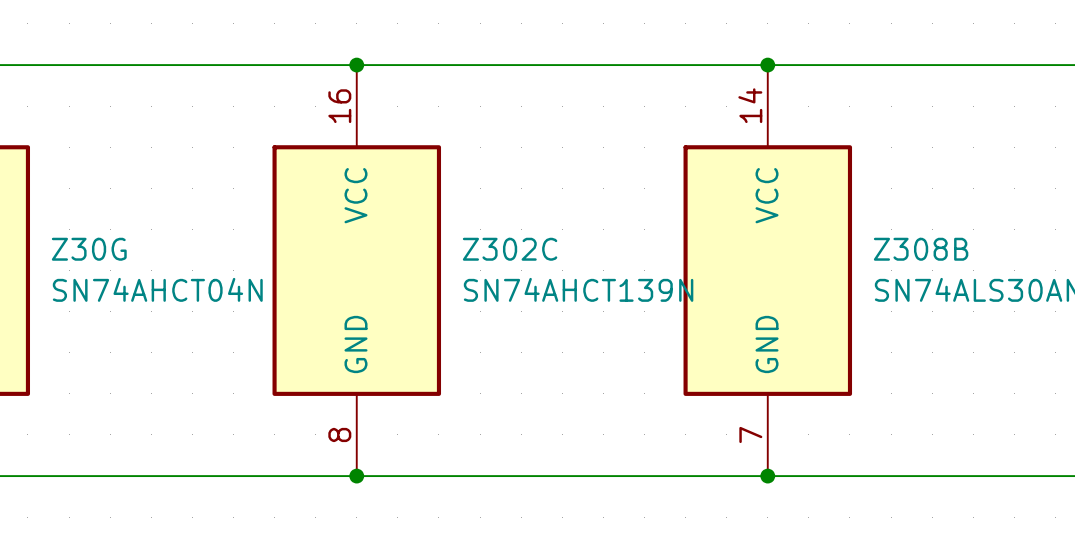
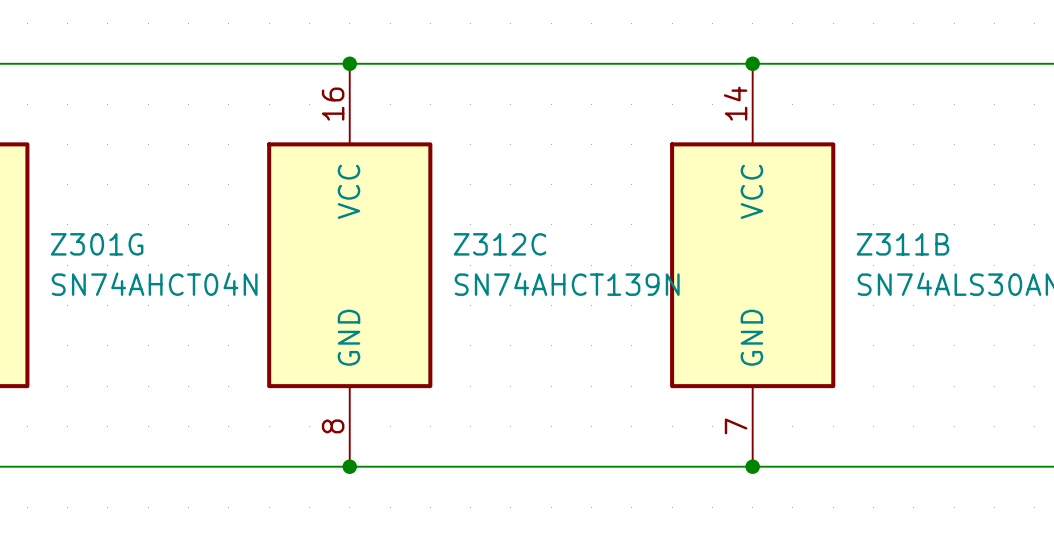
Z30G name: Z30G (89, 249) -> Z301G (97, 244)
Z302C name: Z302C (510, 249) -> Z312C (500, 244)
Z308B name: Z308B (921, 249) -> Z311B (902, 244)

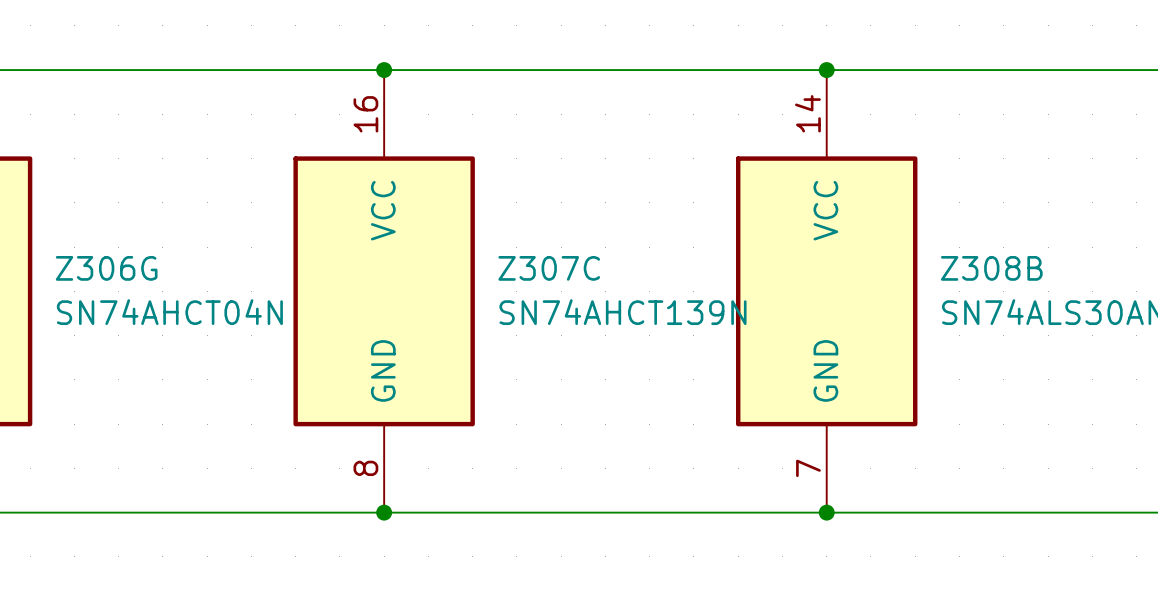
Z301G name: Z301G (97, 244) -> Z306G (106, 268)
Z312C name: Z312C (500, 244) -> Z307C (549, 268)
Z311B name: Z311B (902, 244) -> Z308B (991, 268)

